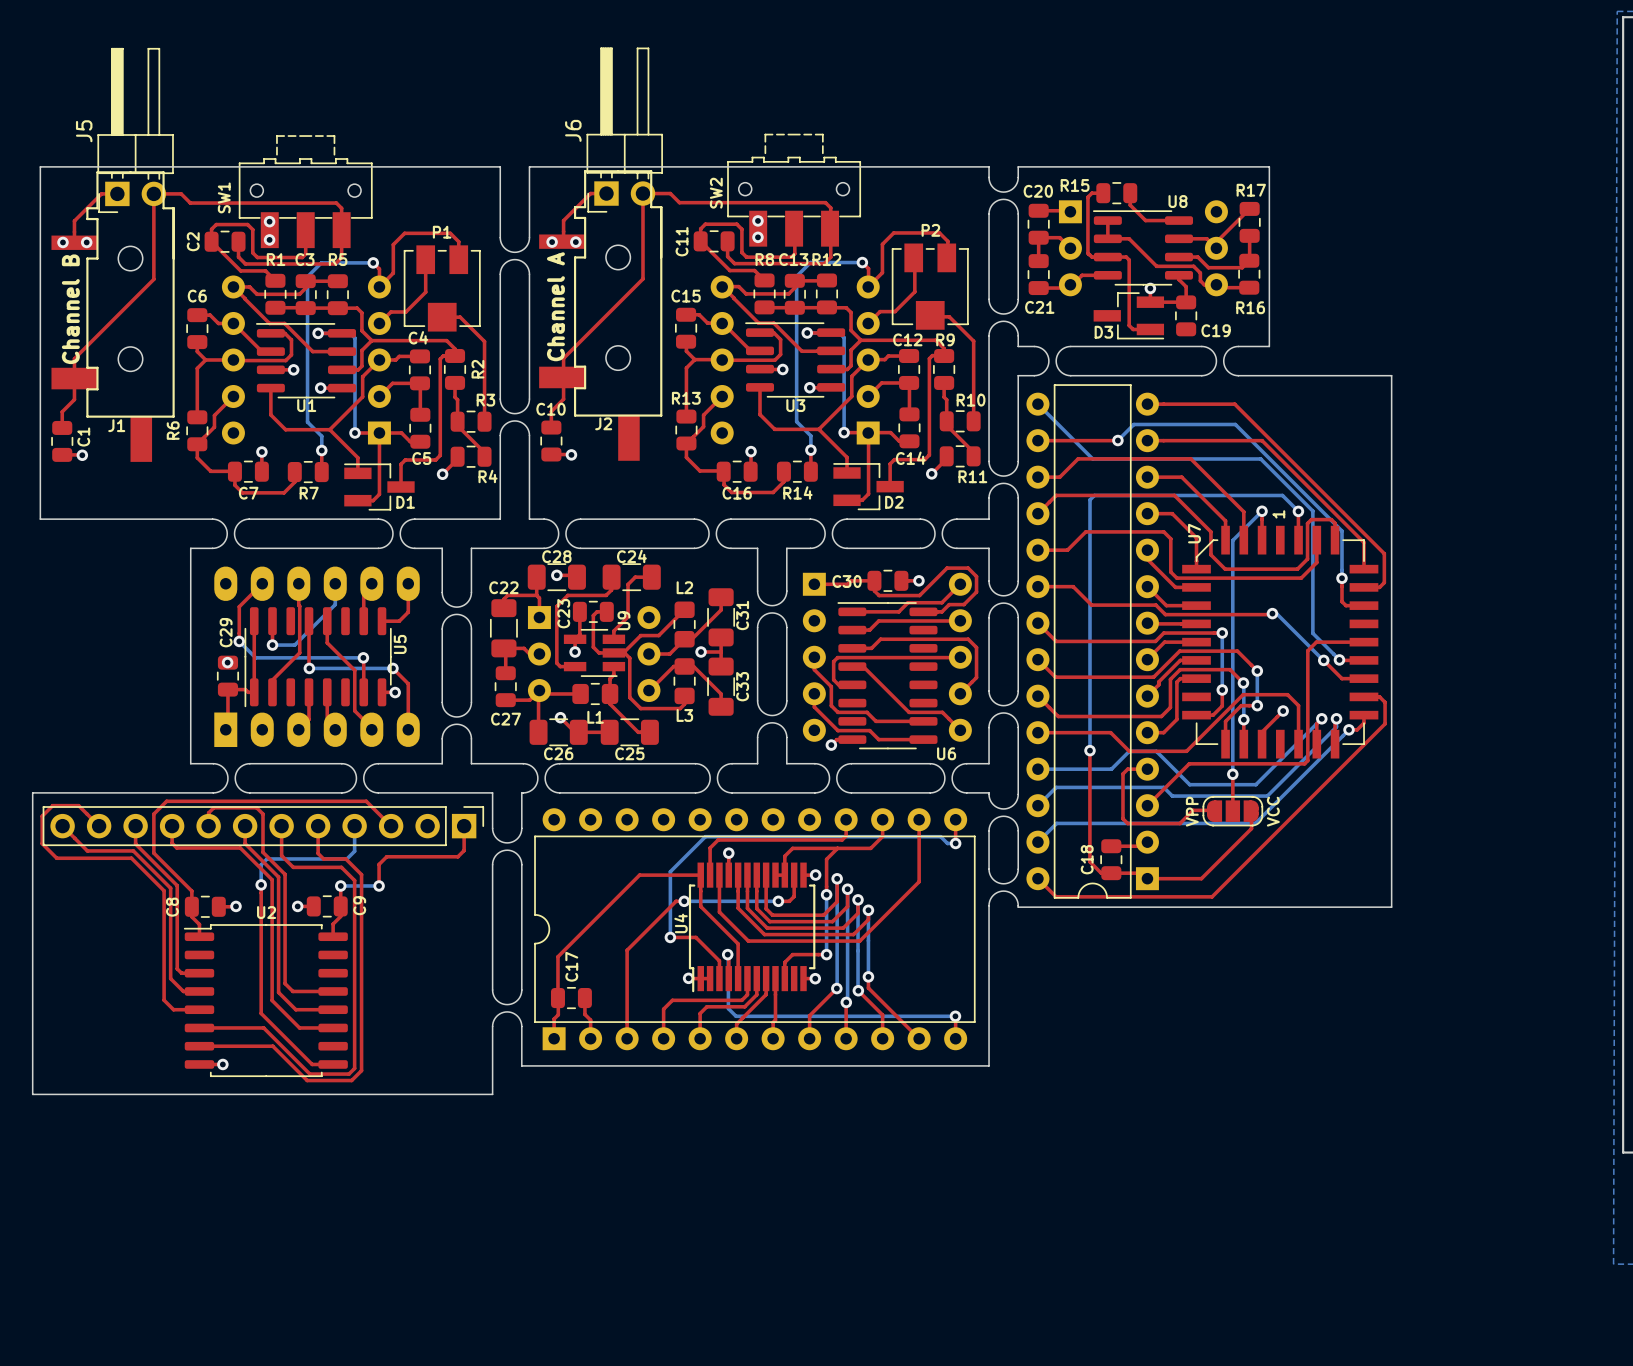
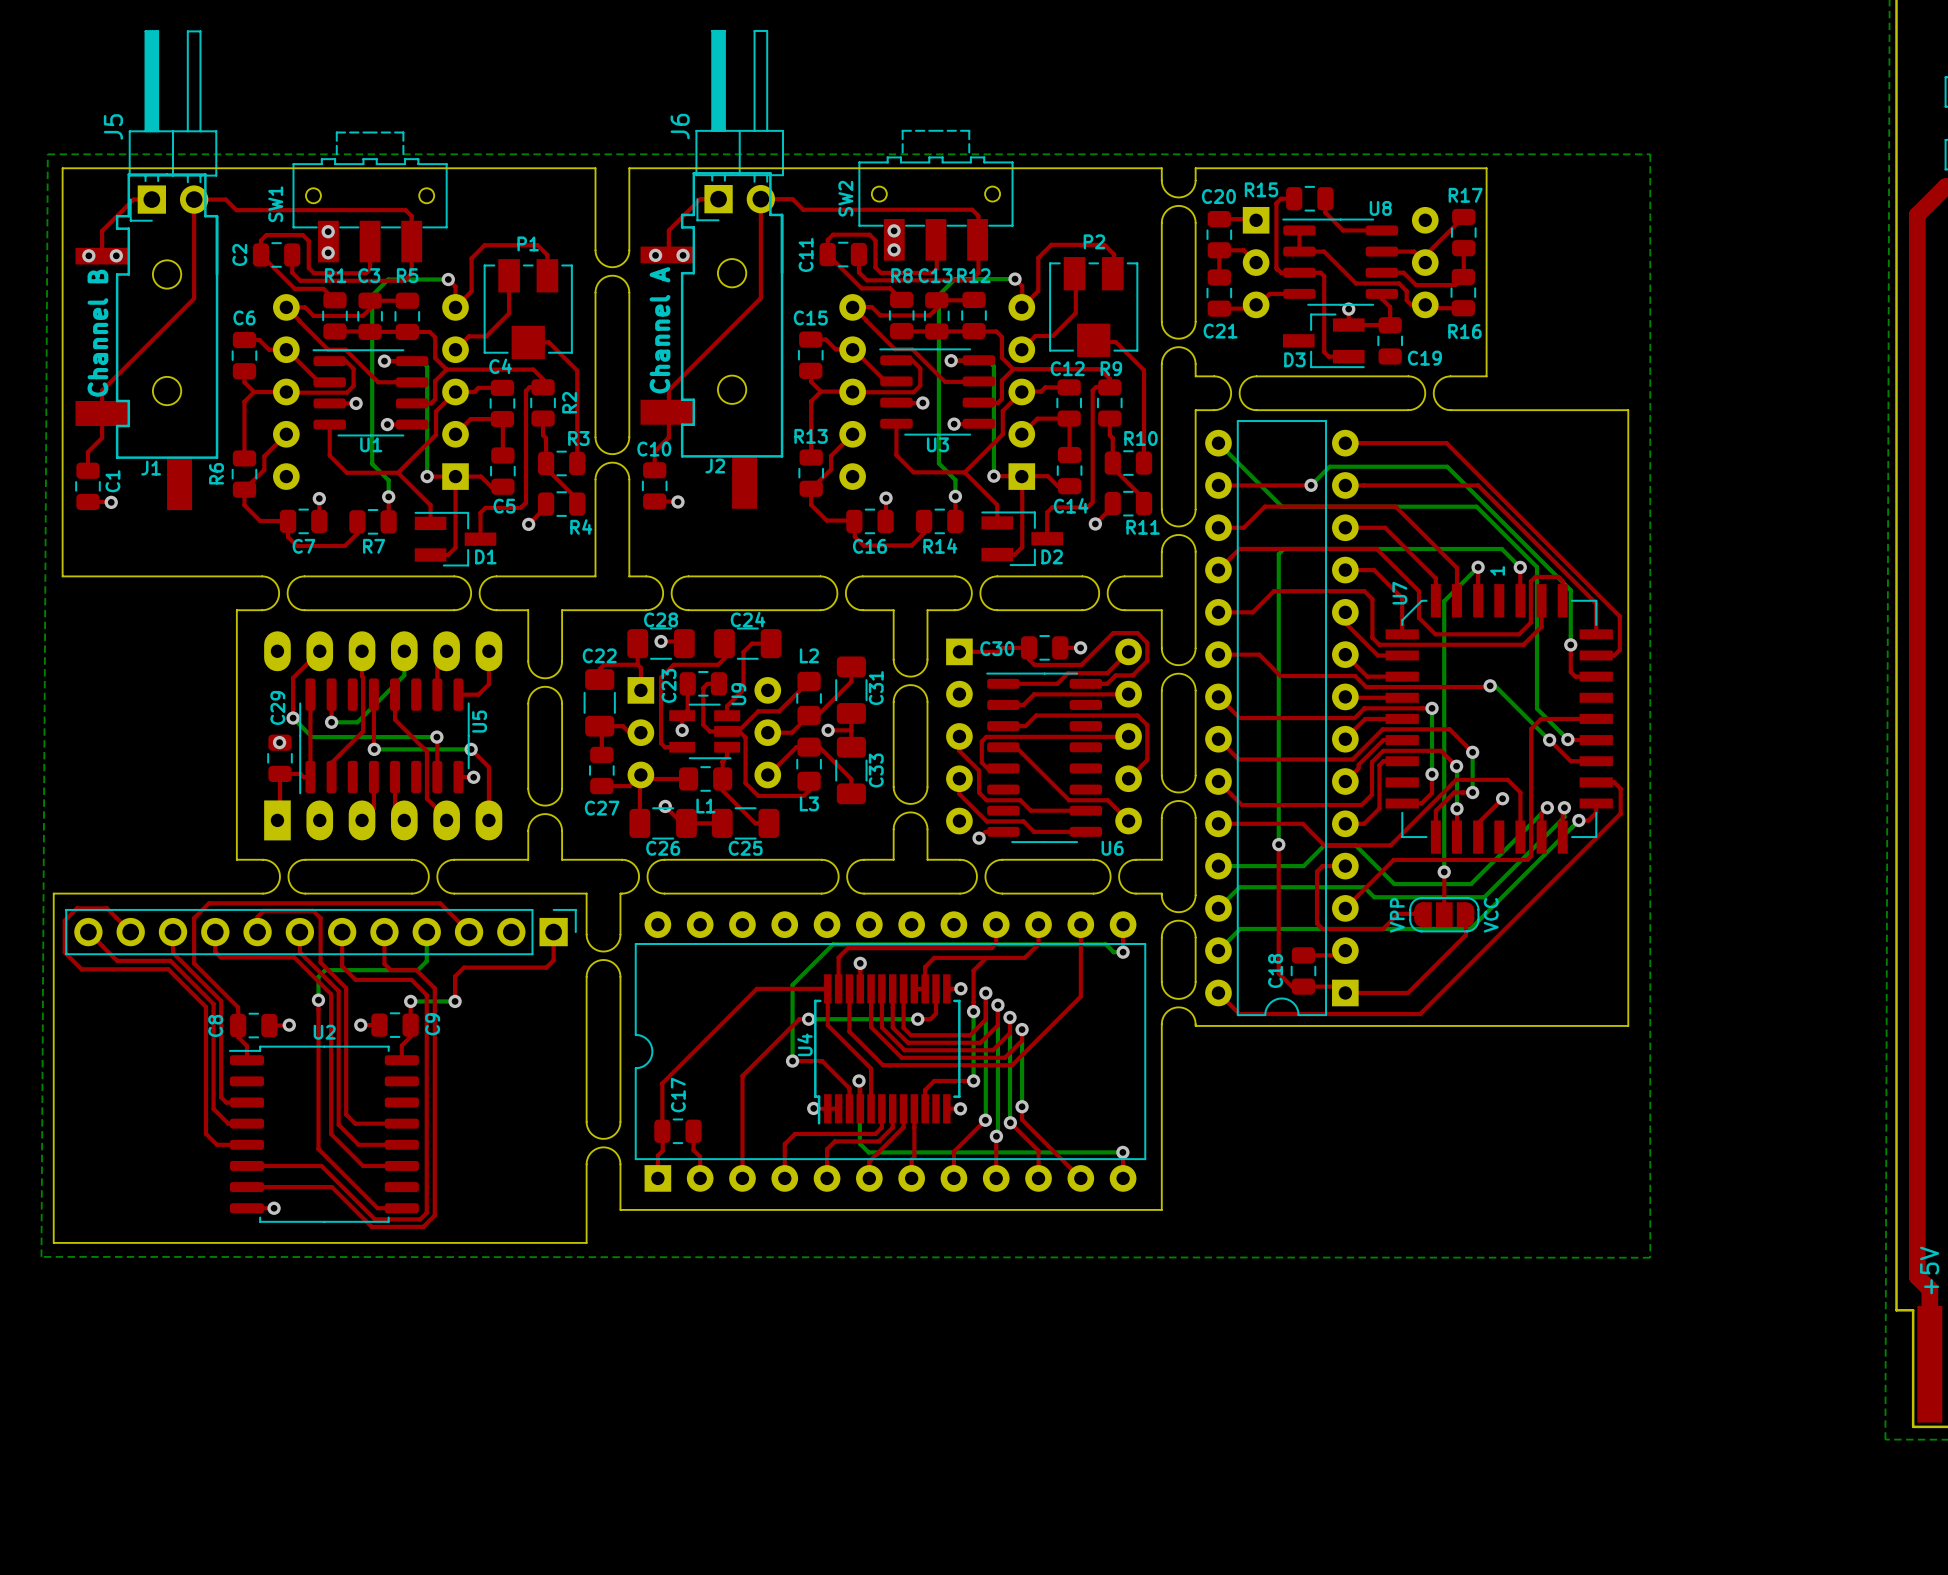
bottom zone outline: none -> (47, 154) (41, 1256) (1650, 1257) (1650, 154) (47, 154)

